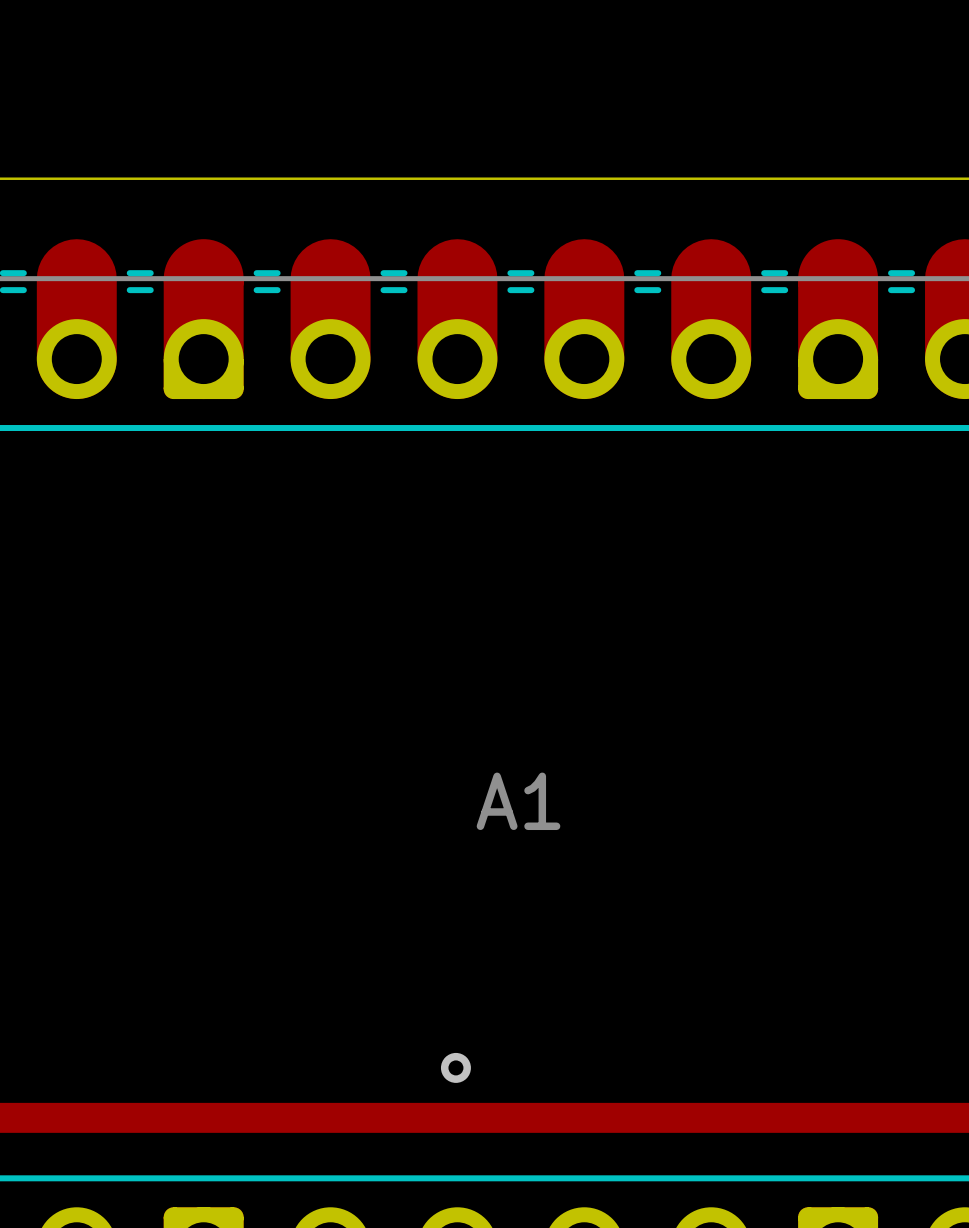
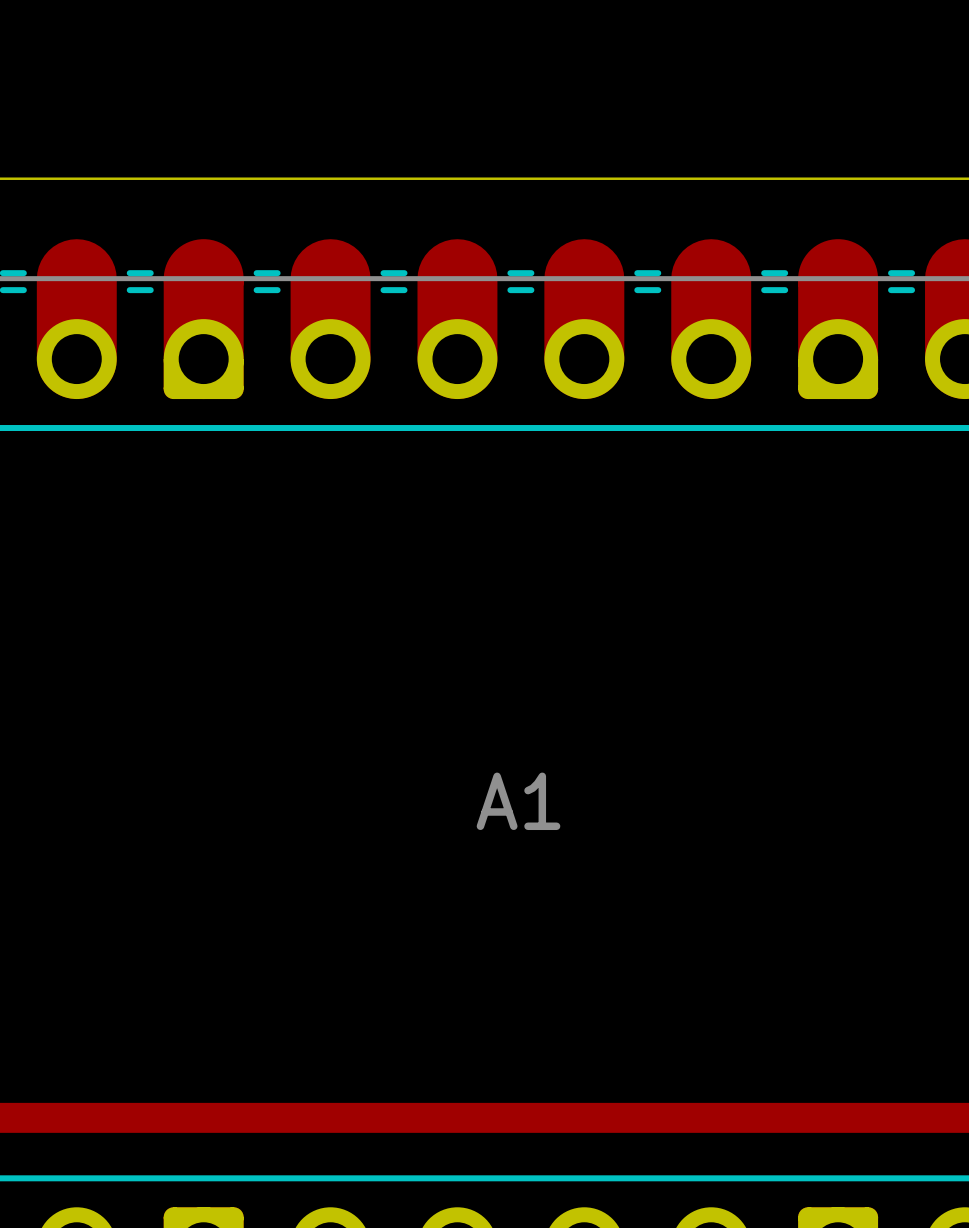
via: (455, 1067) -> none

